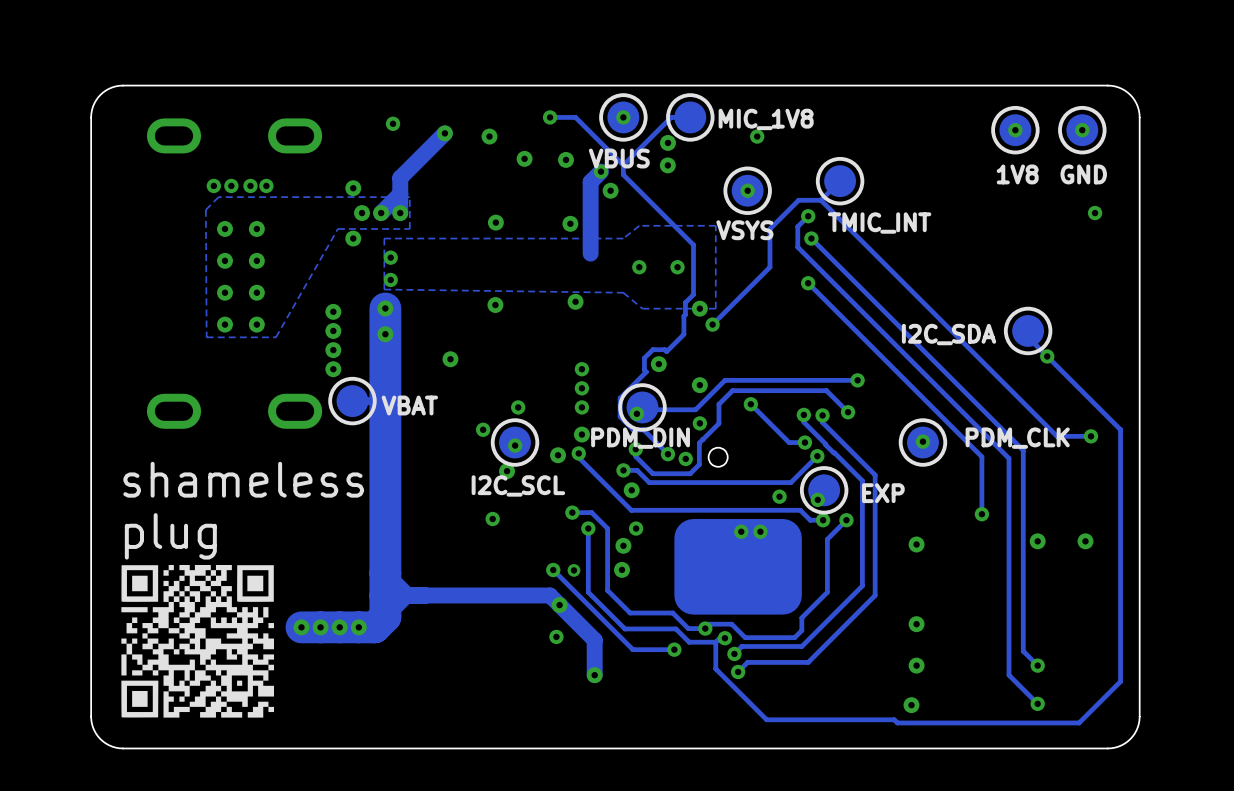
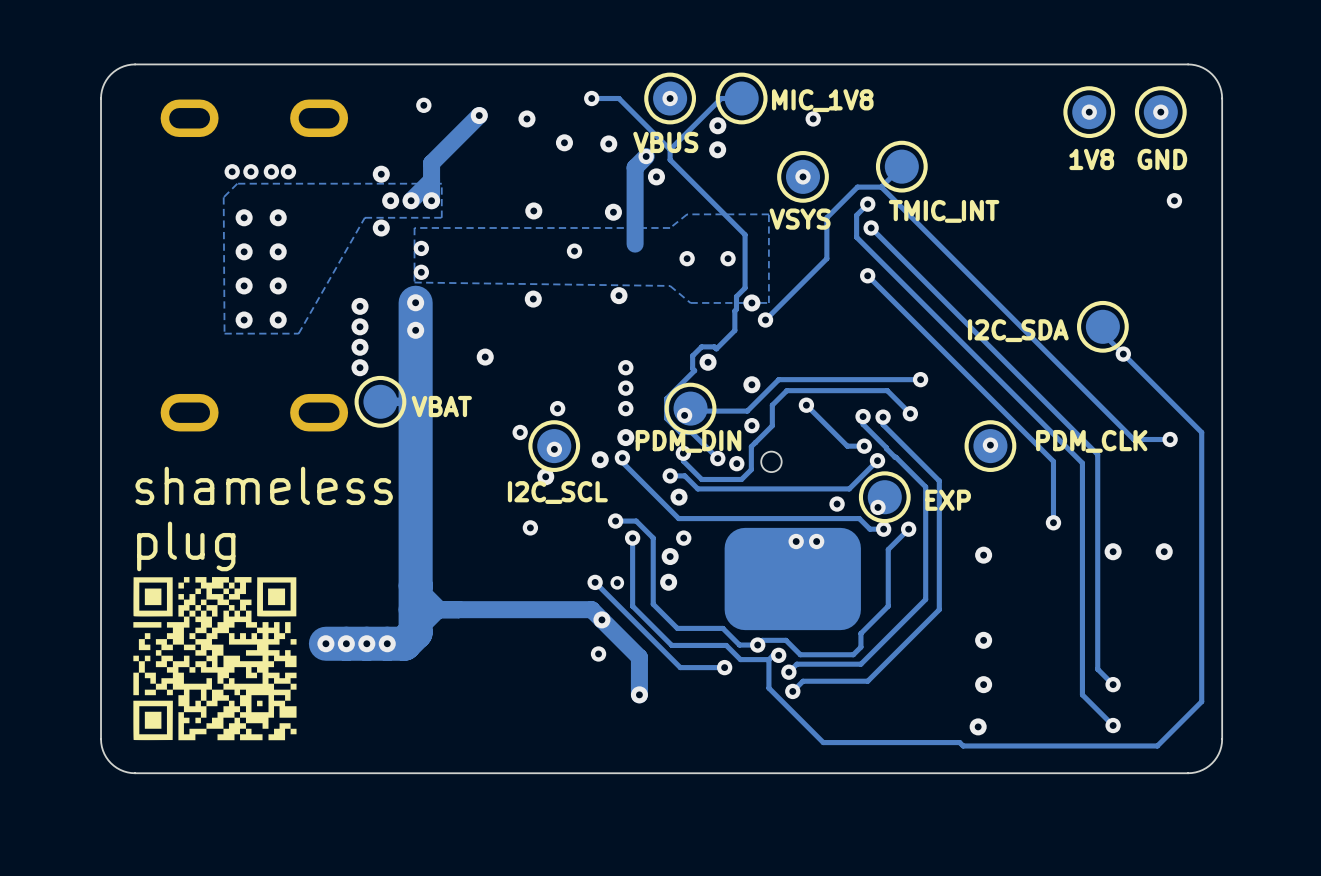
via: none -> (574, 251)

